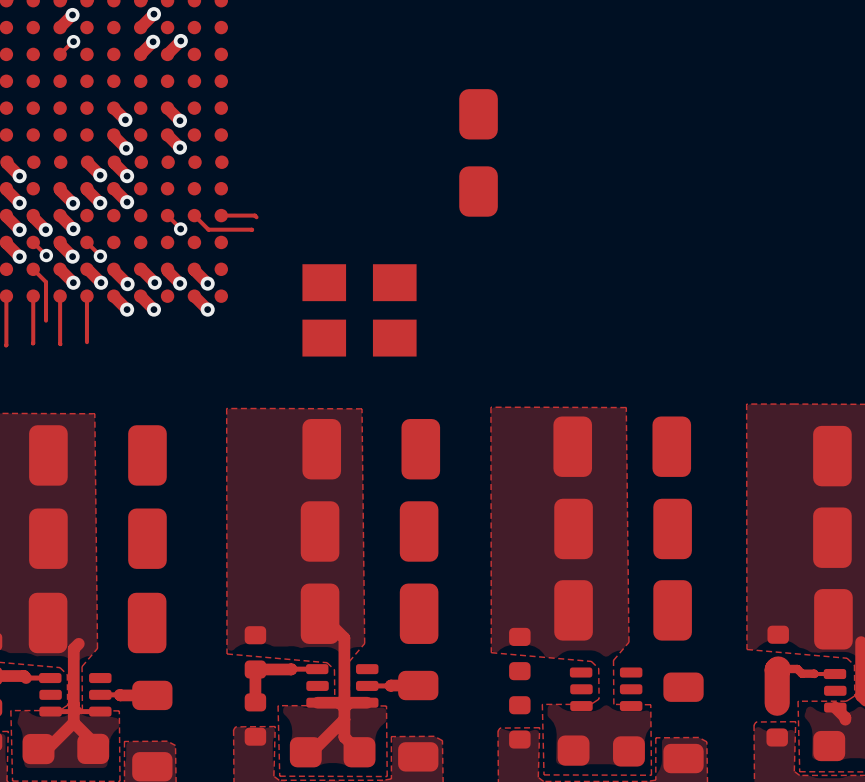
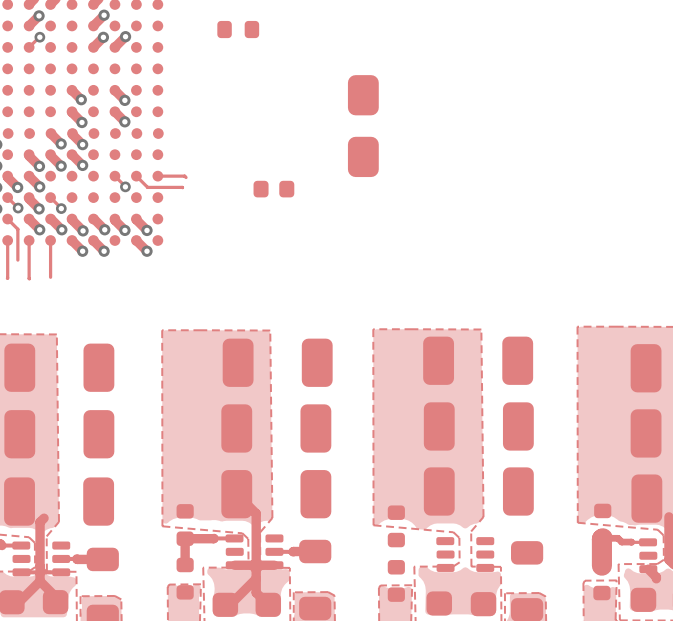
part: none -> (238, 29)
part: none -> (273, 189)
part: (359, 310) -> none

